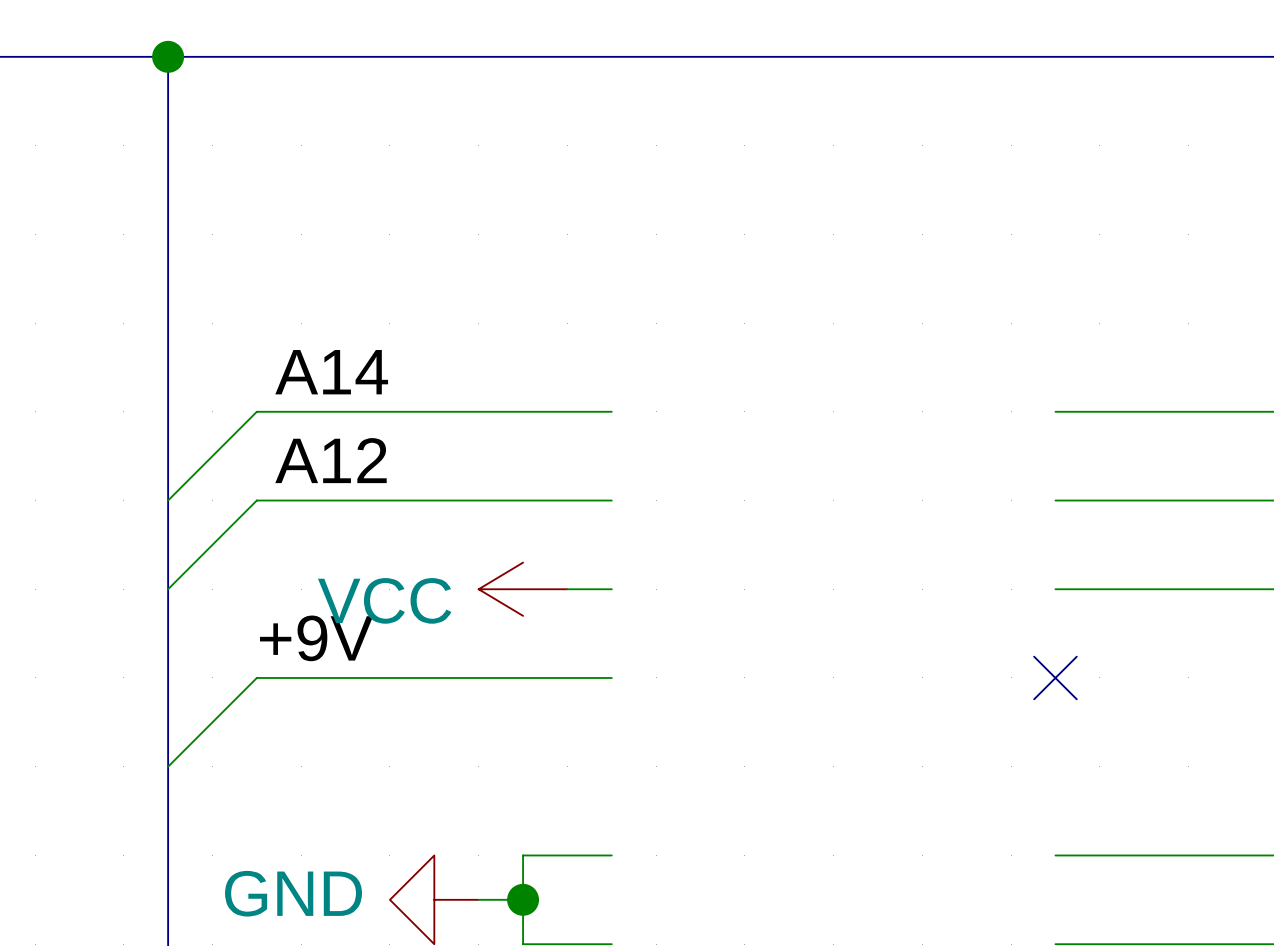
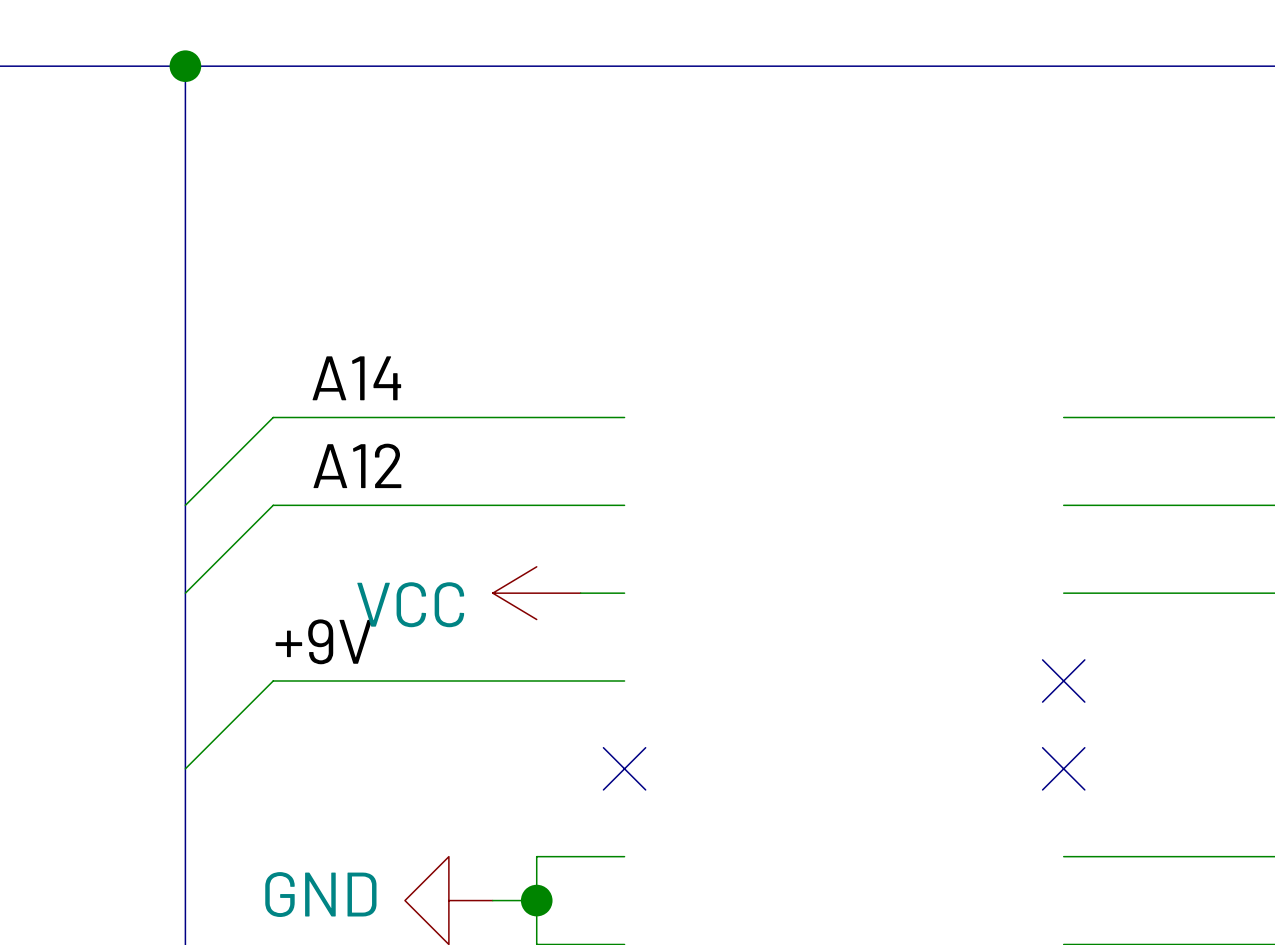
no-connect mark: none -> (624, 768)
no-connect mark: none -> (1063, 768)

